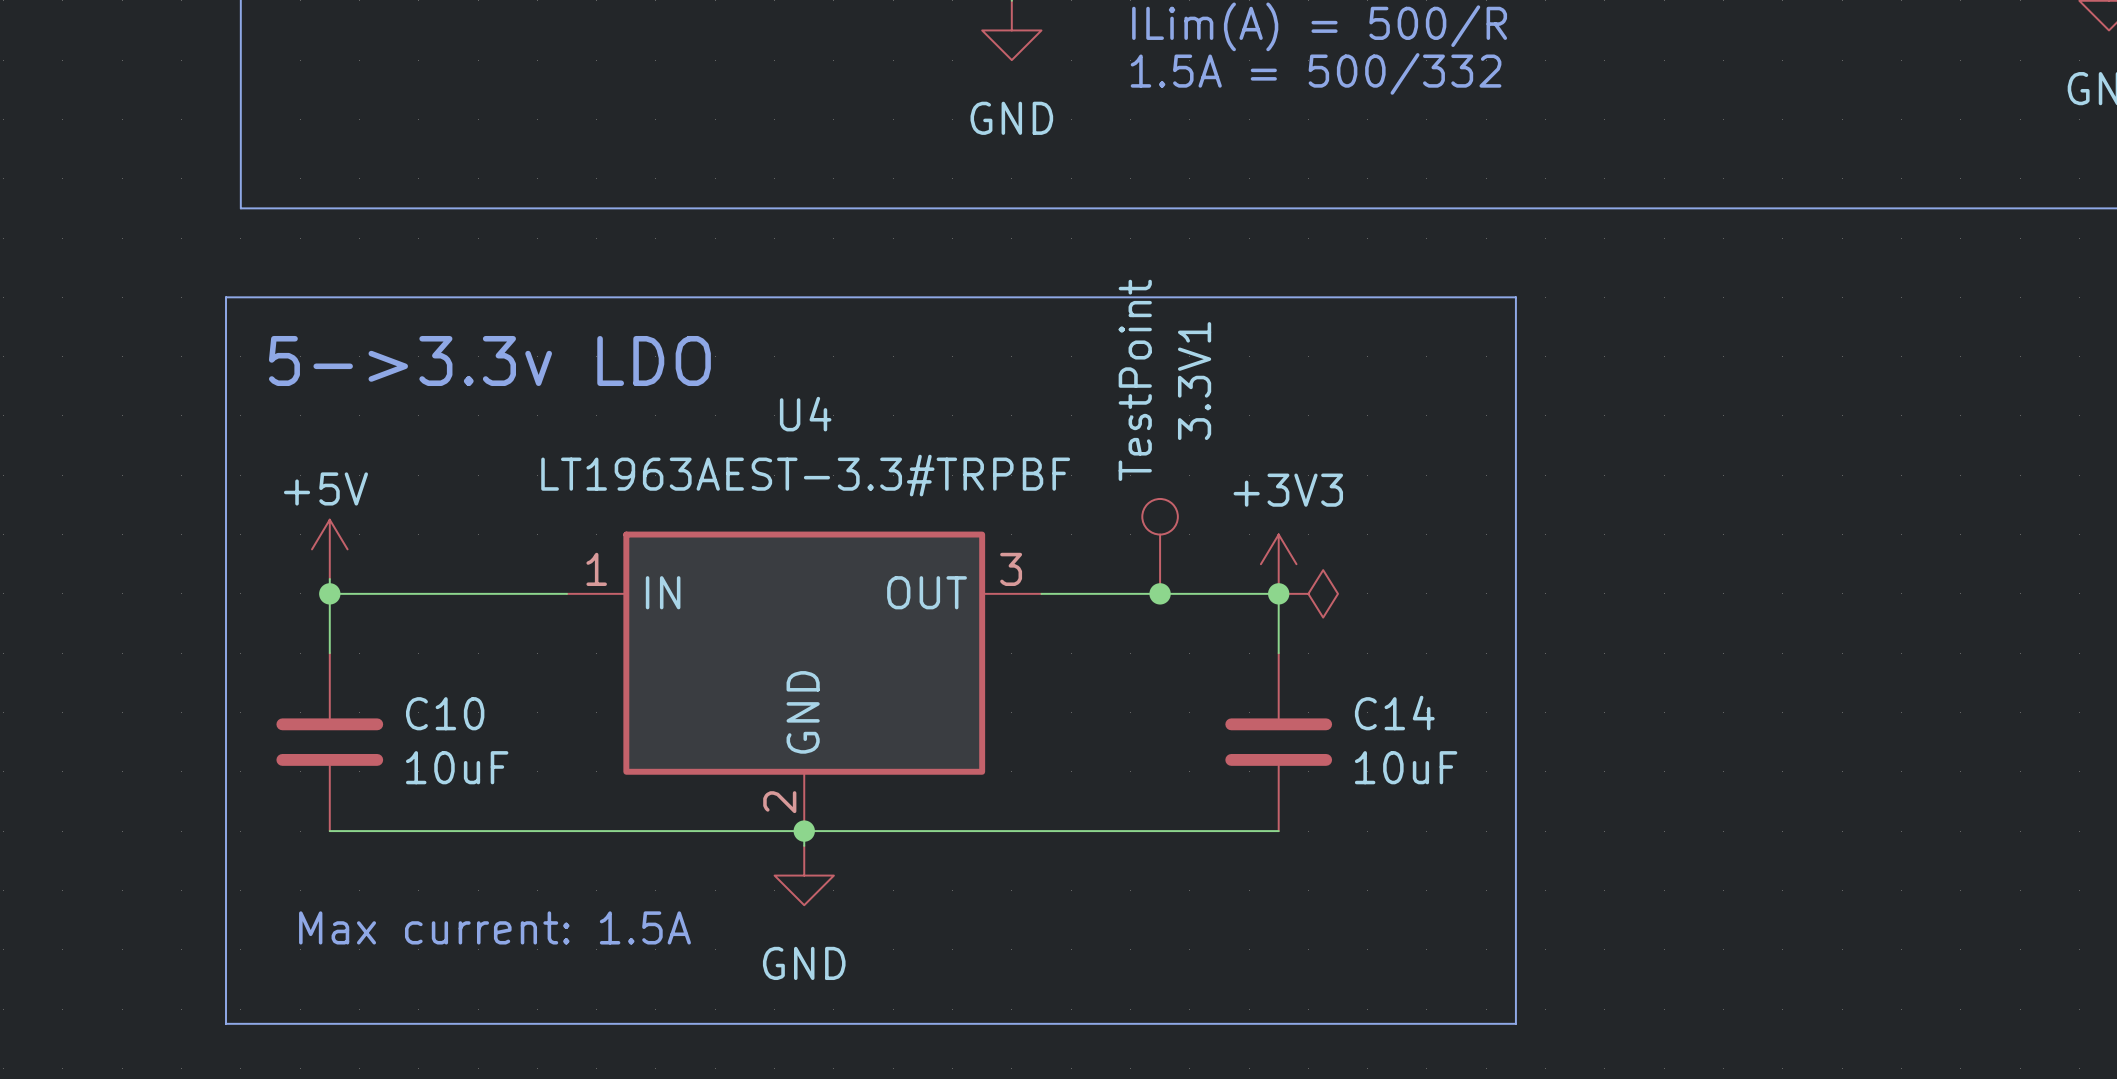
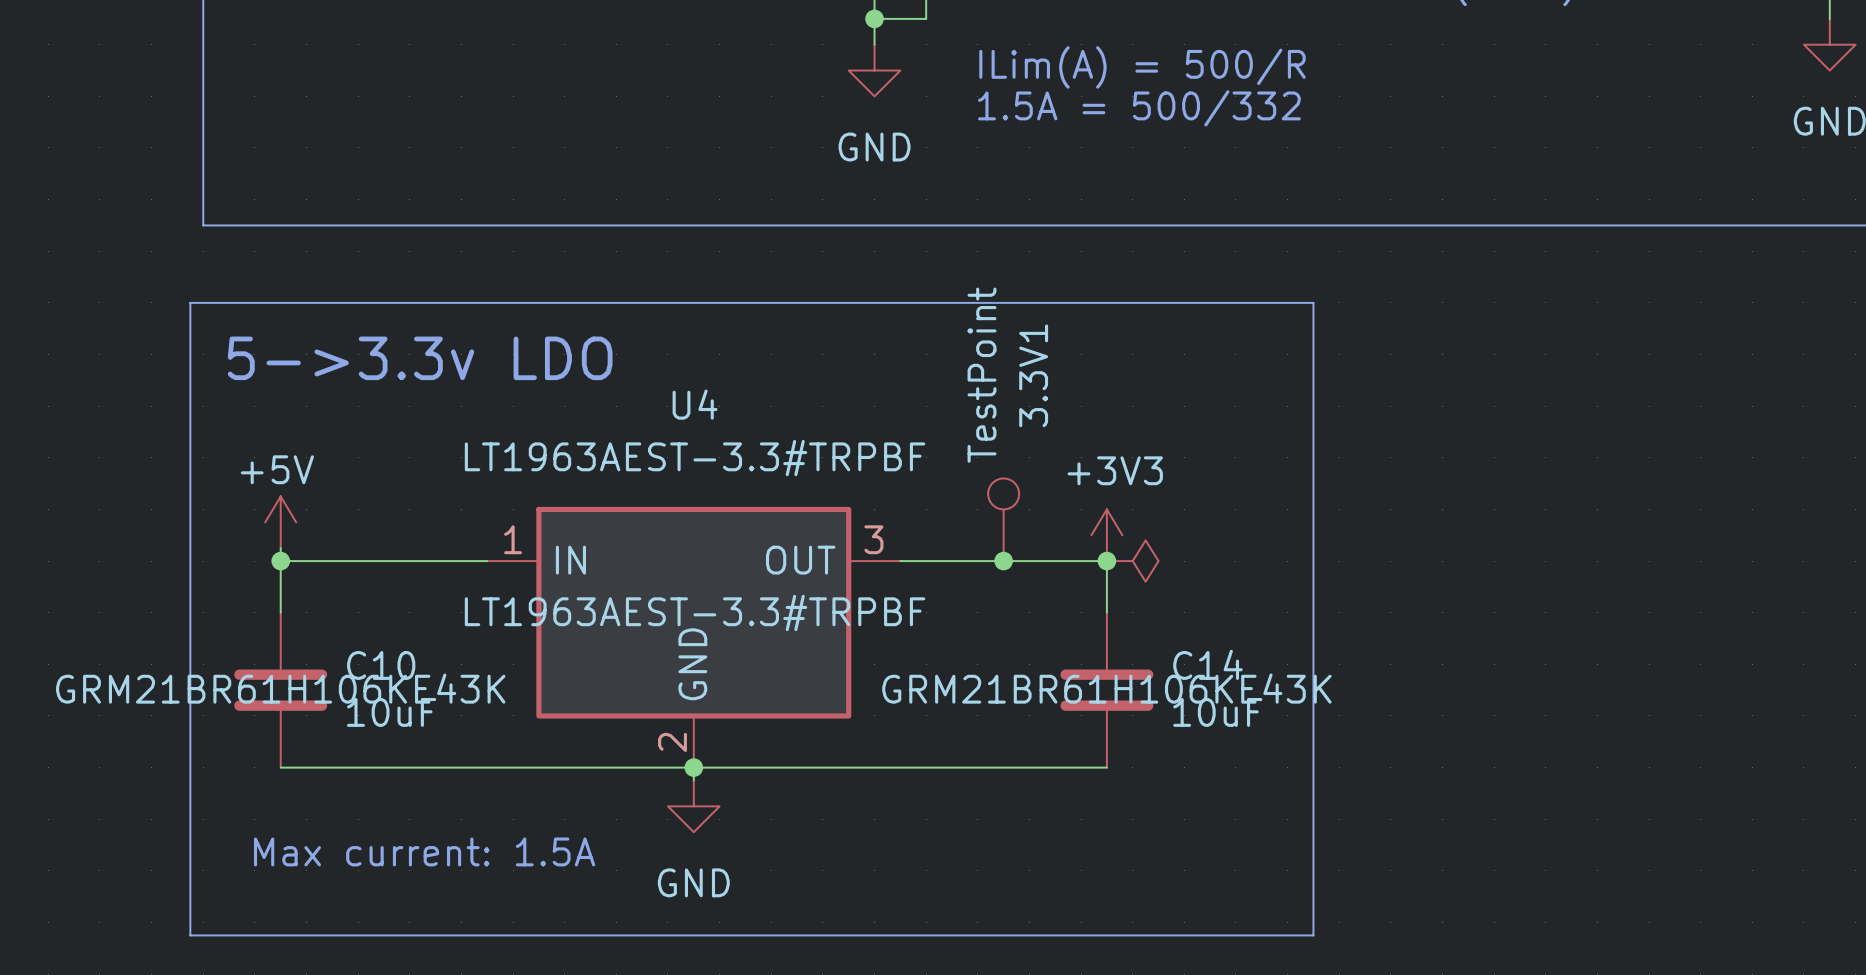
U4 text: none -> LT1963AEST-3.3#TRPBF (695, 612)
C10 text: none -> GRM21BR61H106KE43K (280, 688)
C14 text: none -> GRM21BR61H106KE43K (1106, 688)

